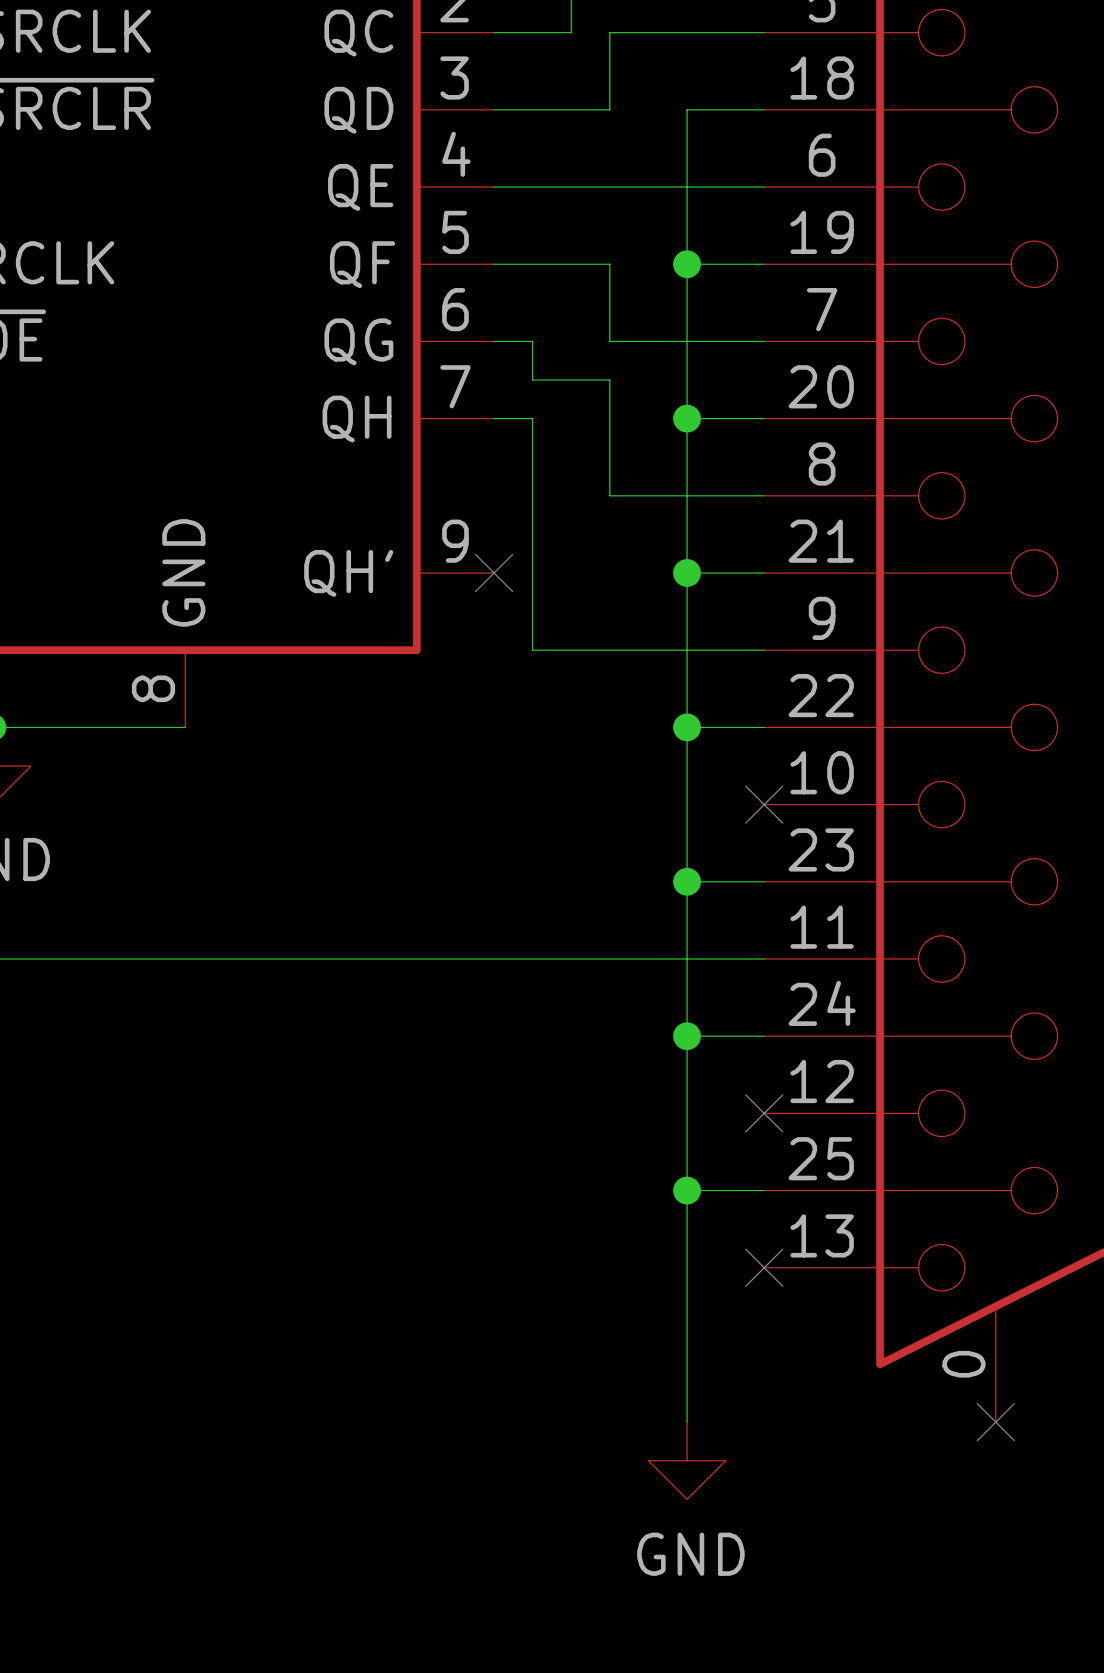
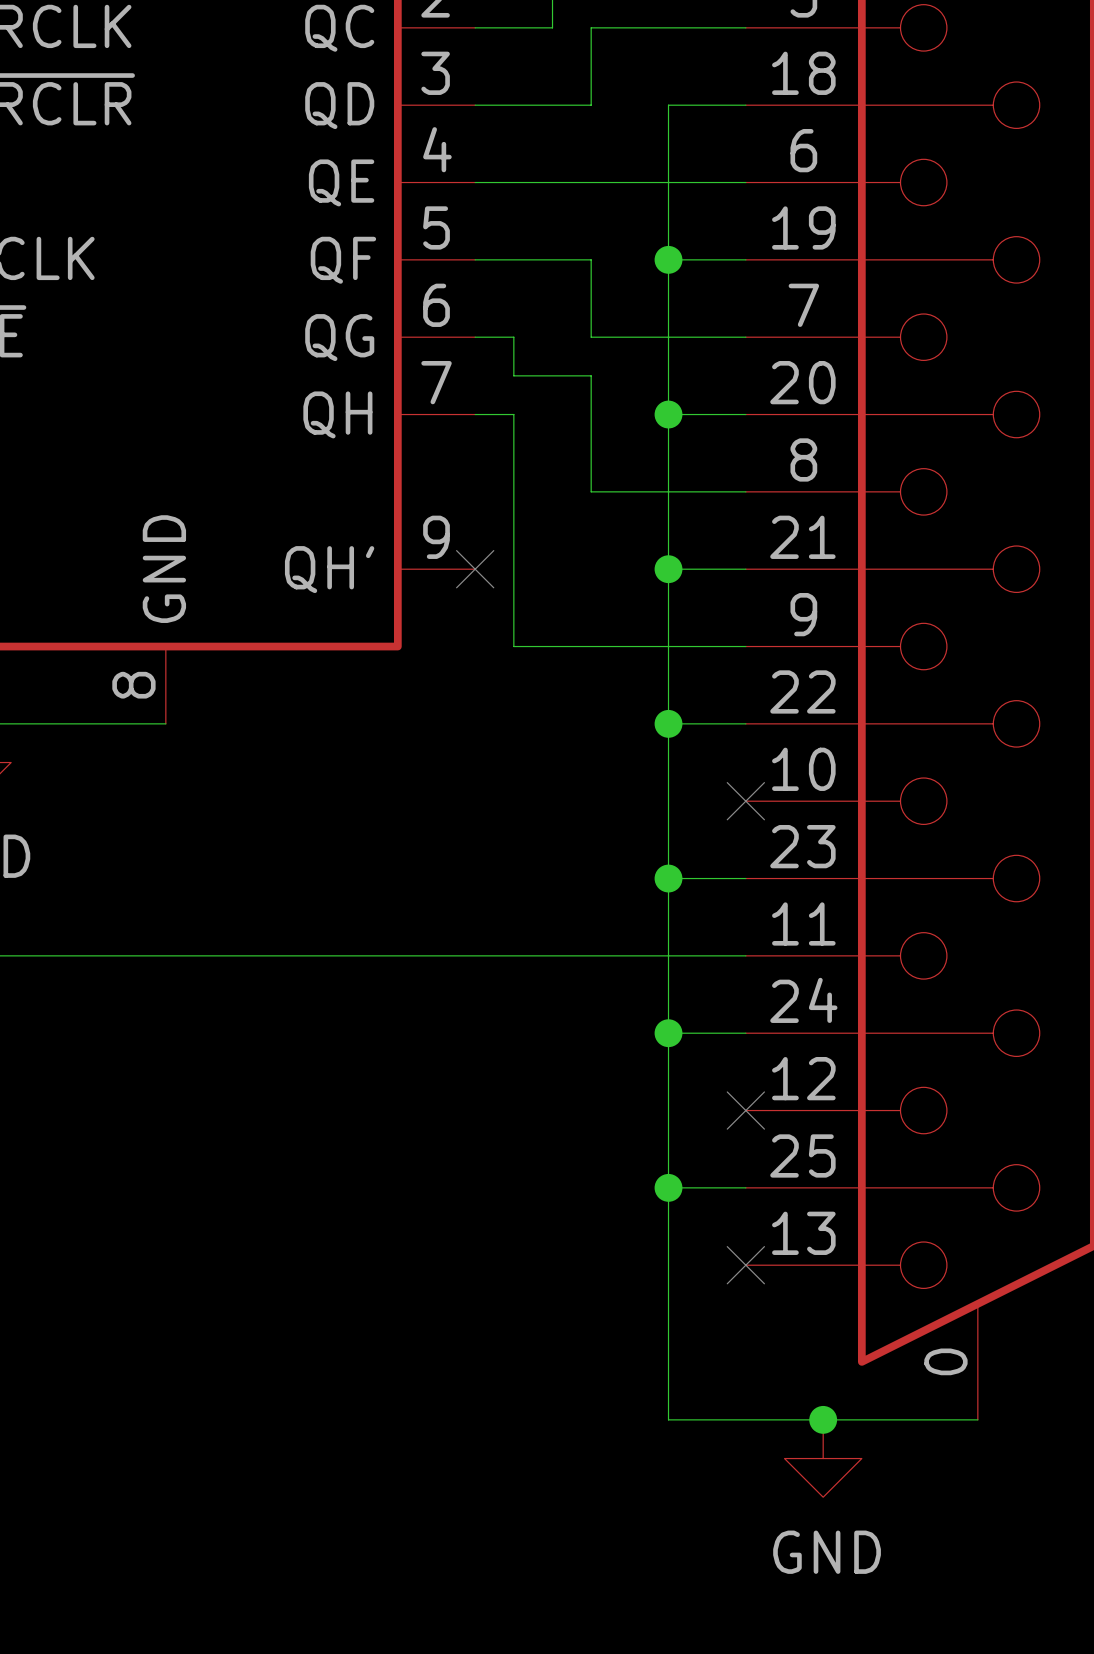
wire: none -> (668, 1419) (977, 1419)
junction: none -> (823, 1419)
no-connect mark: (995, 1422) -> none
power symbol position: GND (687, 1460) -> GND (823, 1458)

